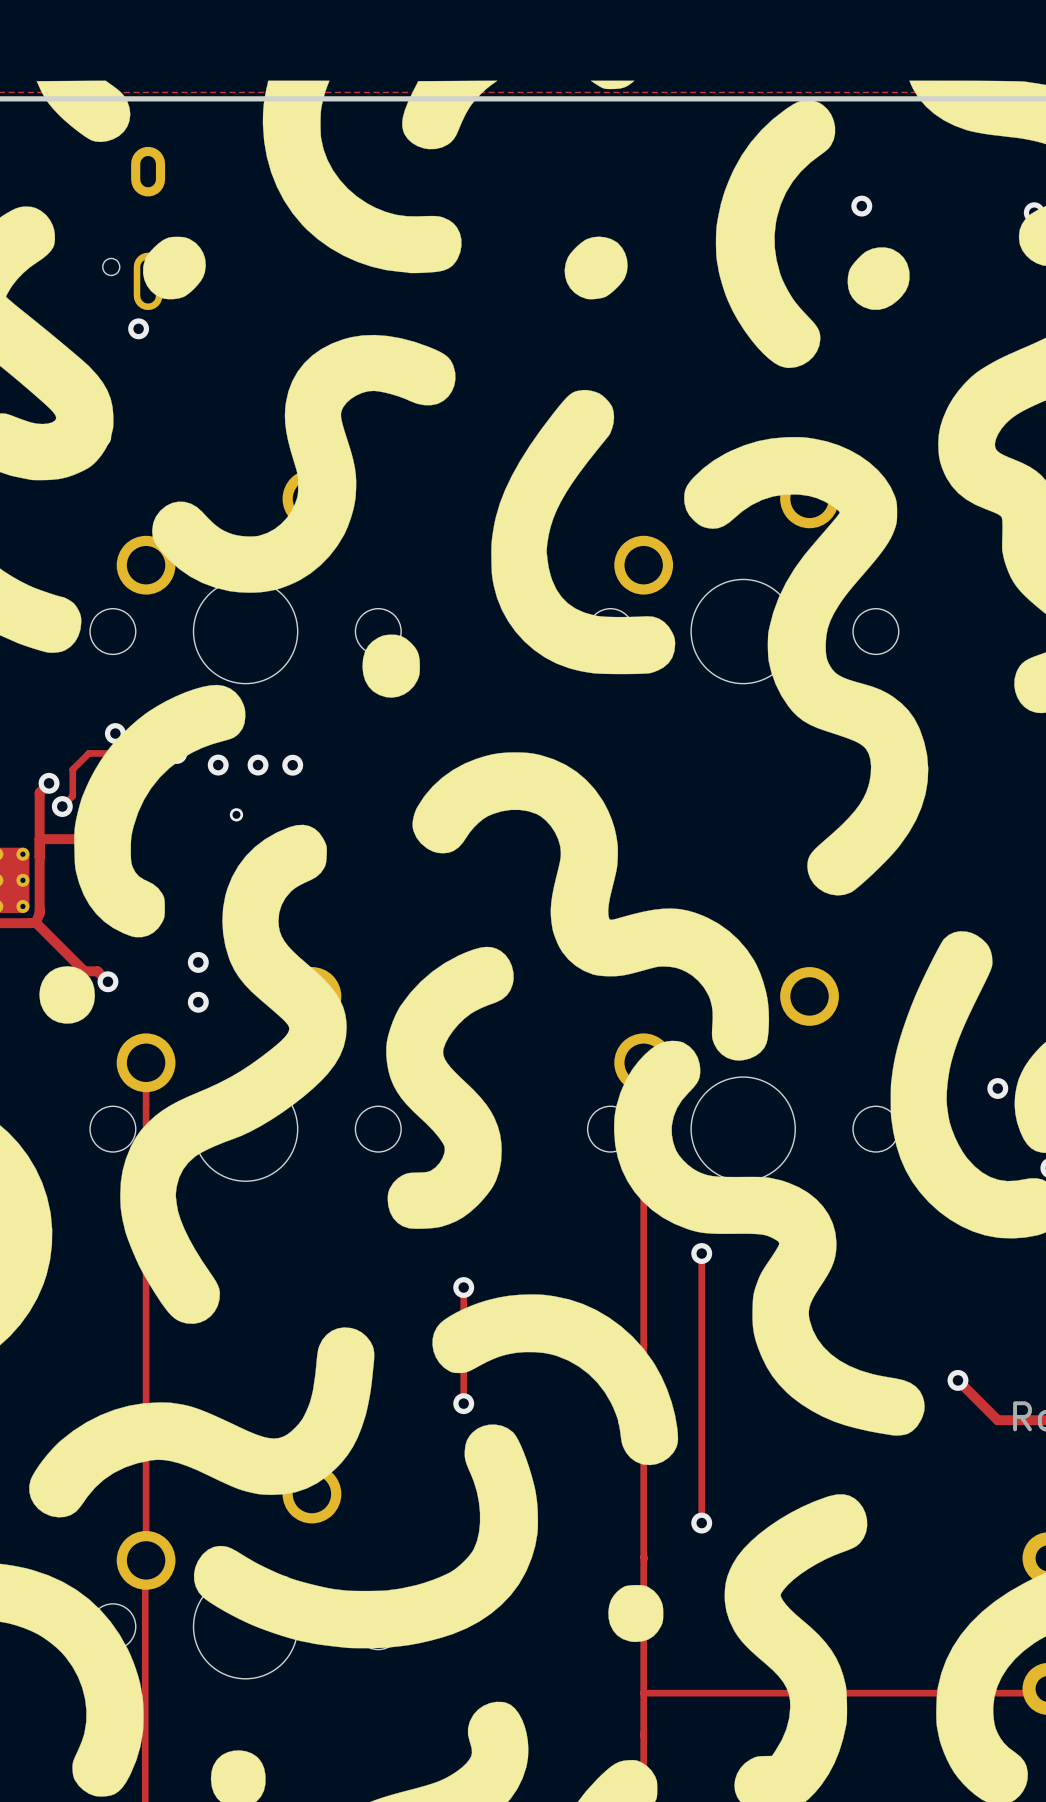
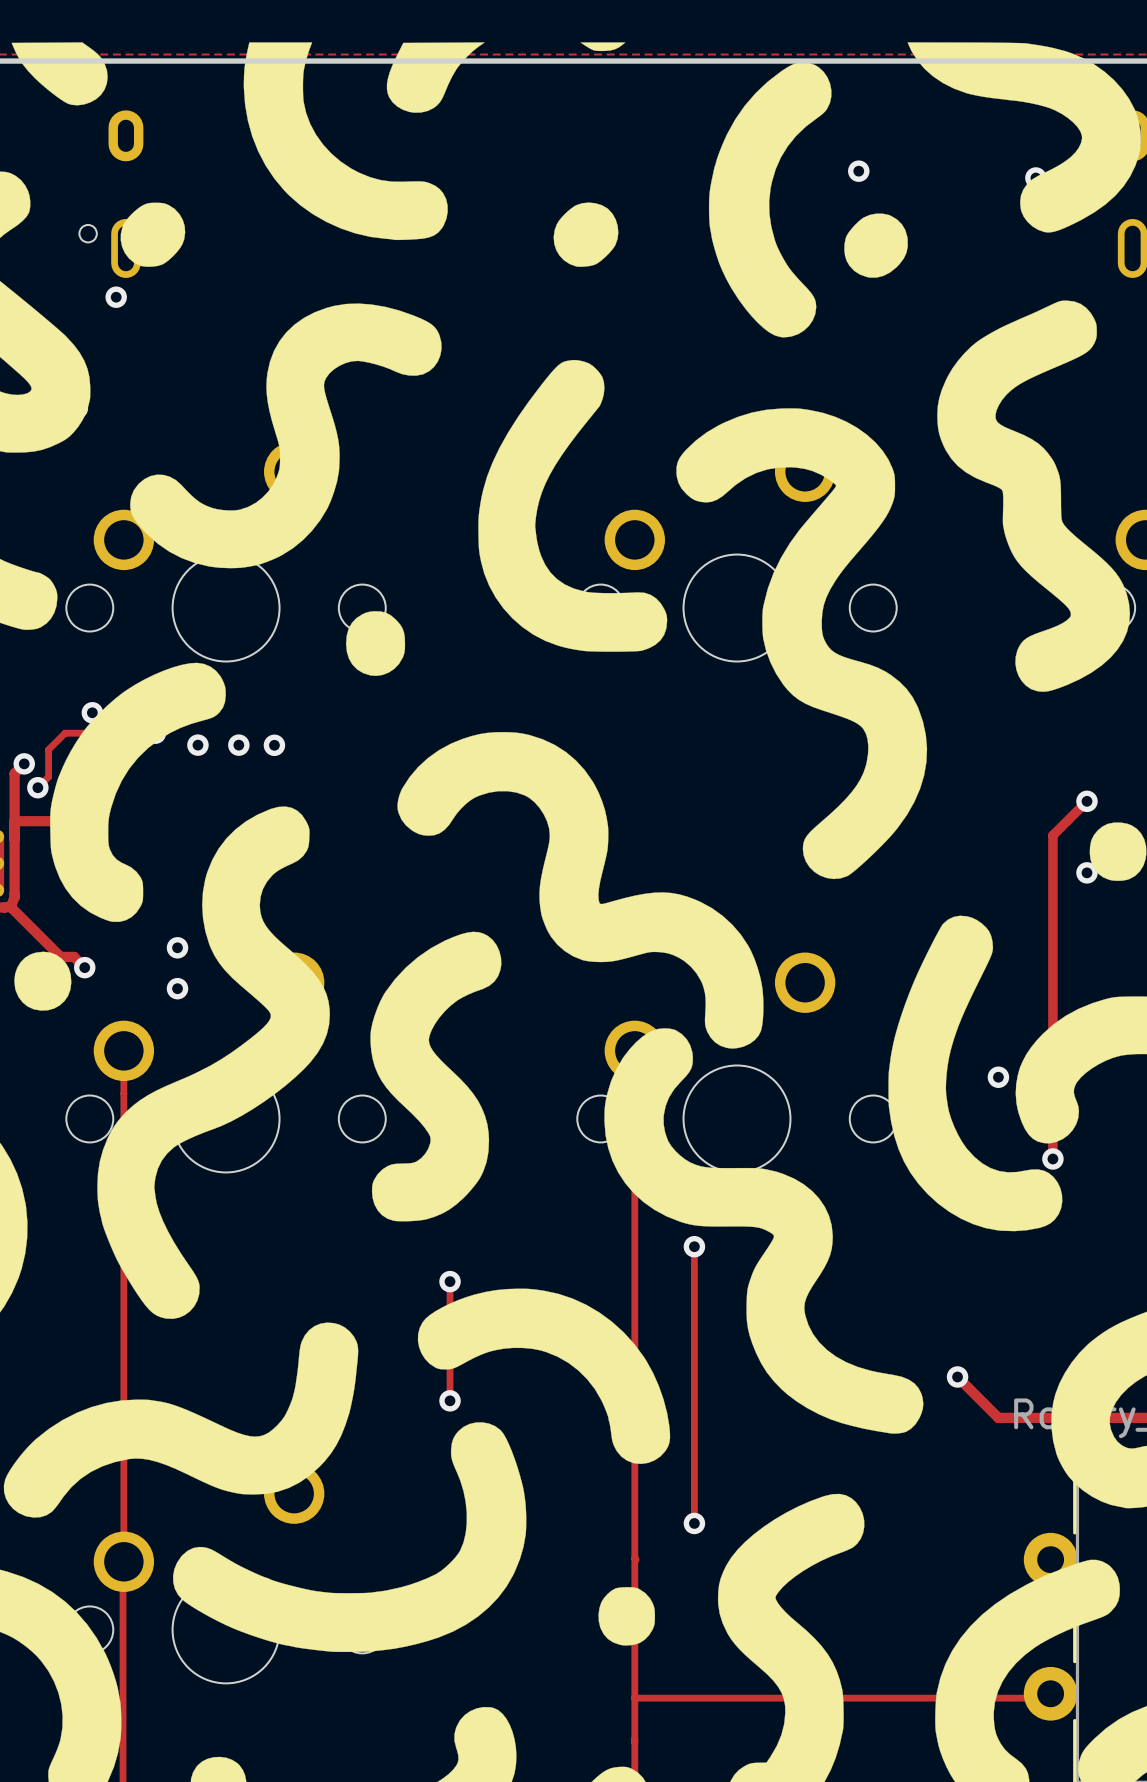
via: (236, 814) -> none

